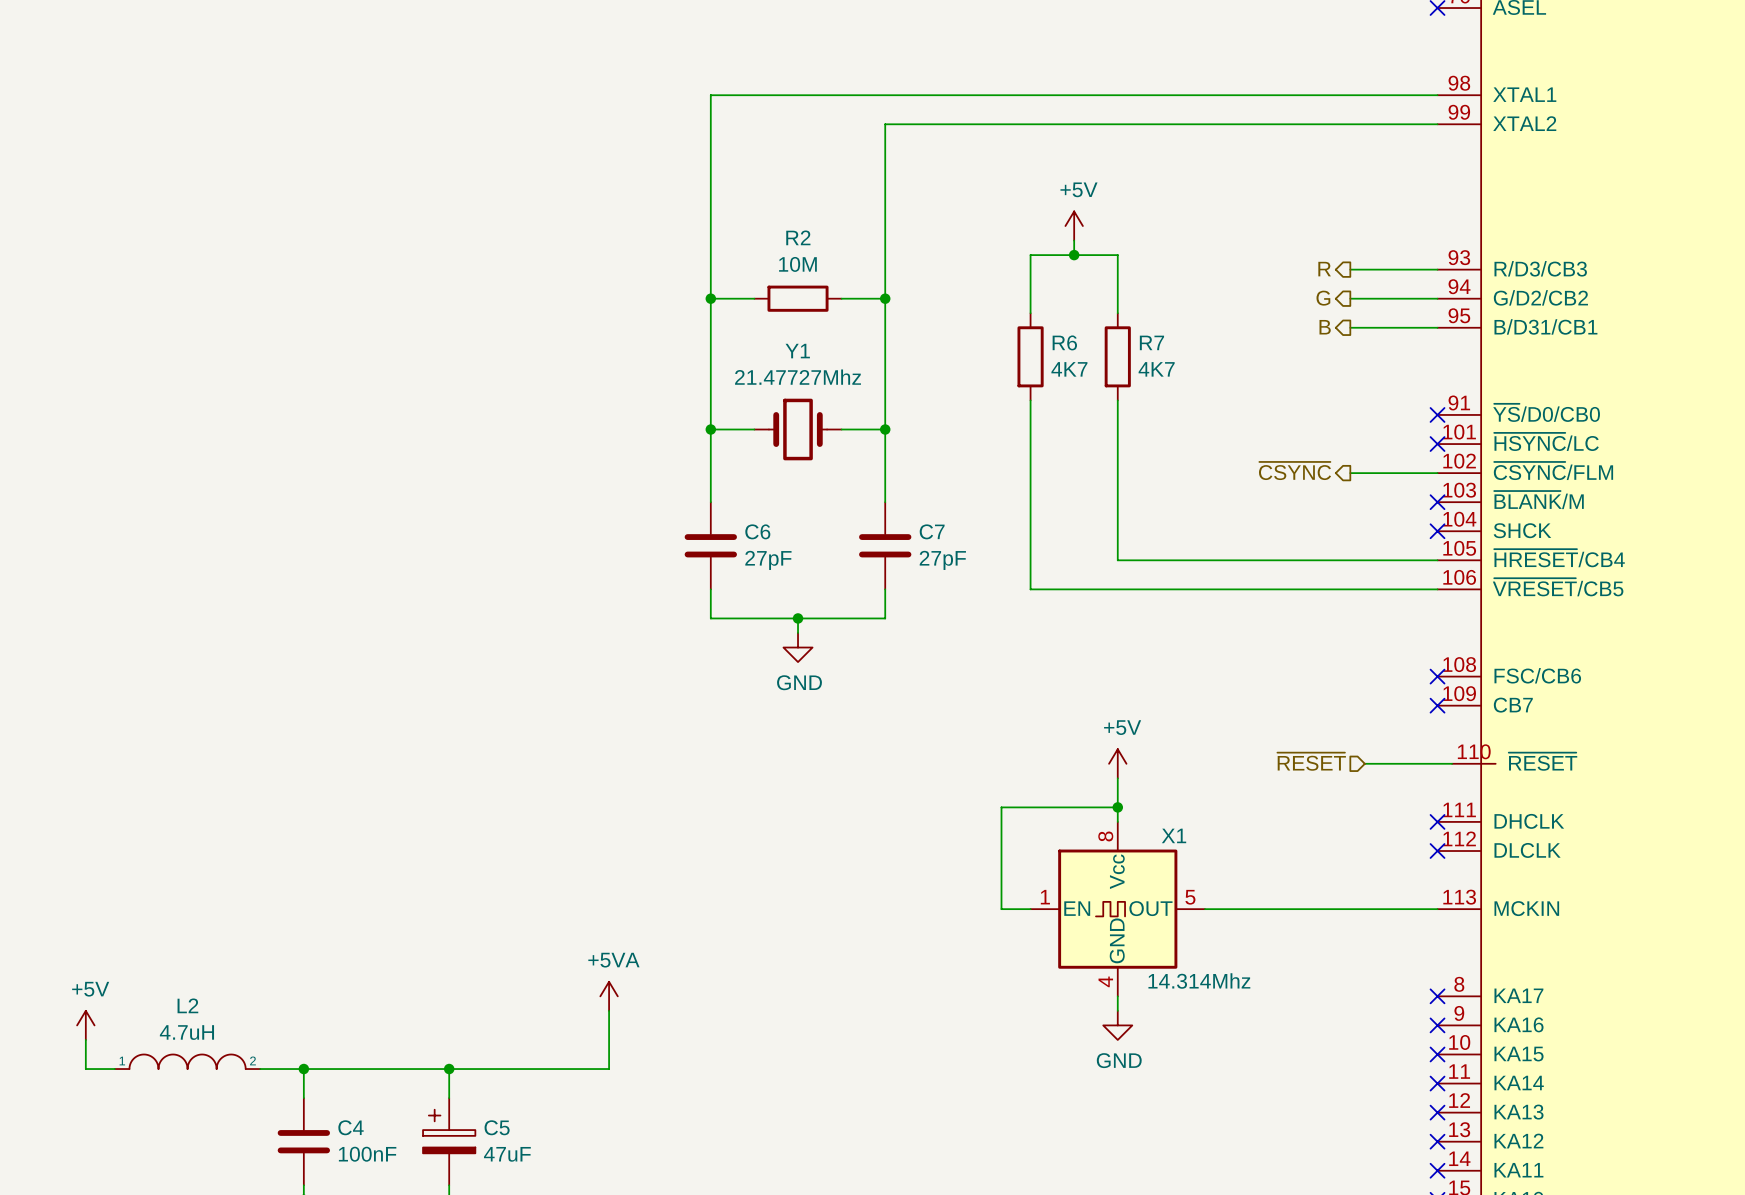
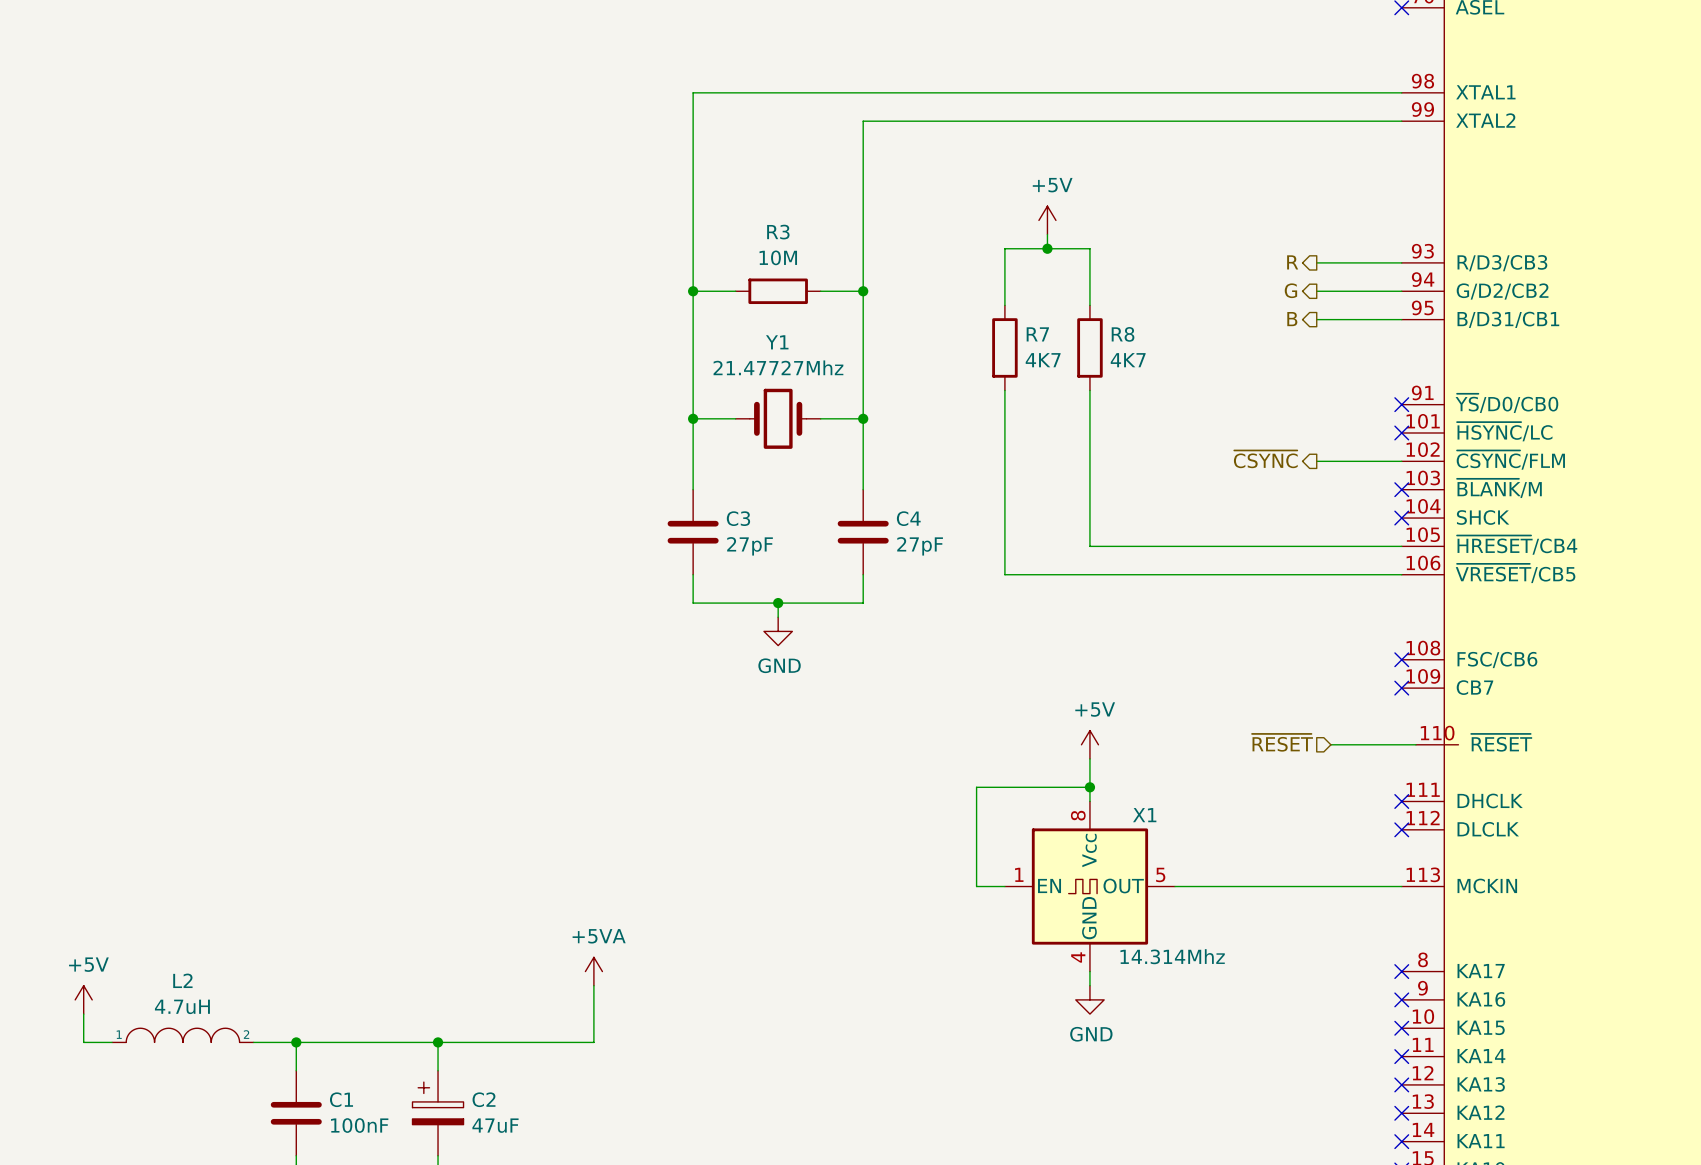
R2 name: R2 (798, 237) -> R3 (778, 232)
R6 name: R6 (1064, 342) -> R7 (1037, 334)
R7 name: R7 (1151, 342) -> R8 (1123, 334)
C6 name: C6 (757, 531) -> C3 (738, 518)
C7 name: C7 (932, 531) -> C4 (908, 518)
C4 name: C4 (351, 1127) -> C1 (341, 1099)
C5 name: C5 (497, 1127) -> C2 (484, 1099)

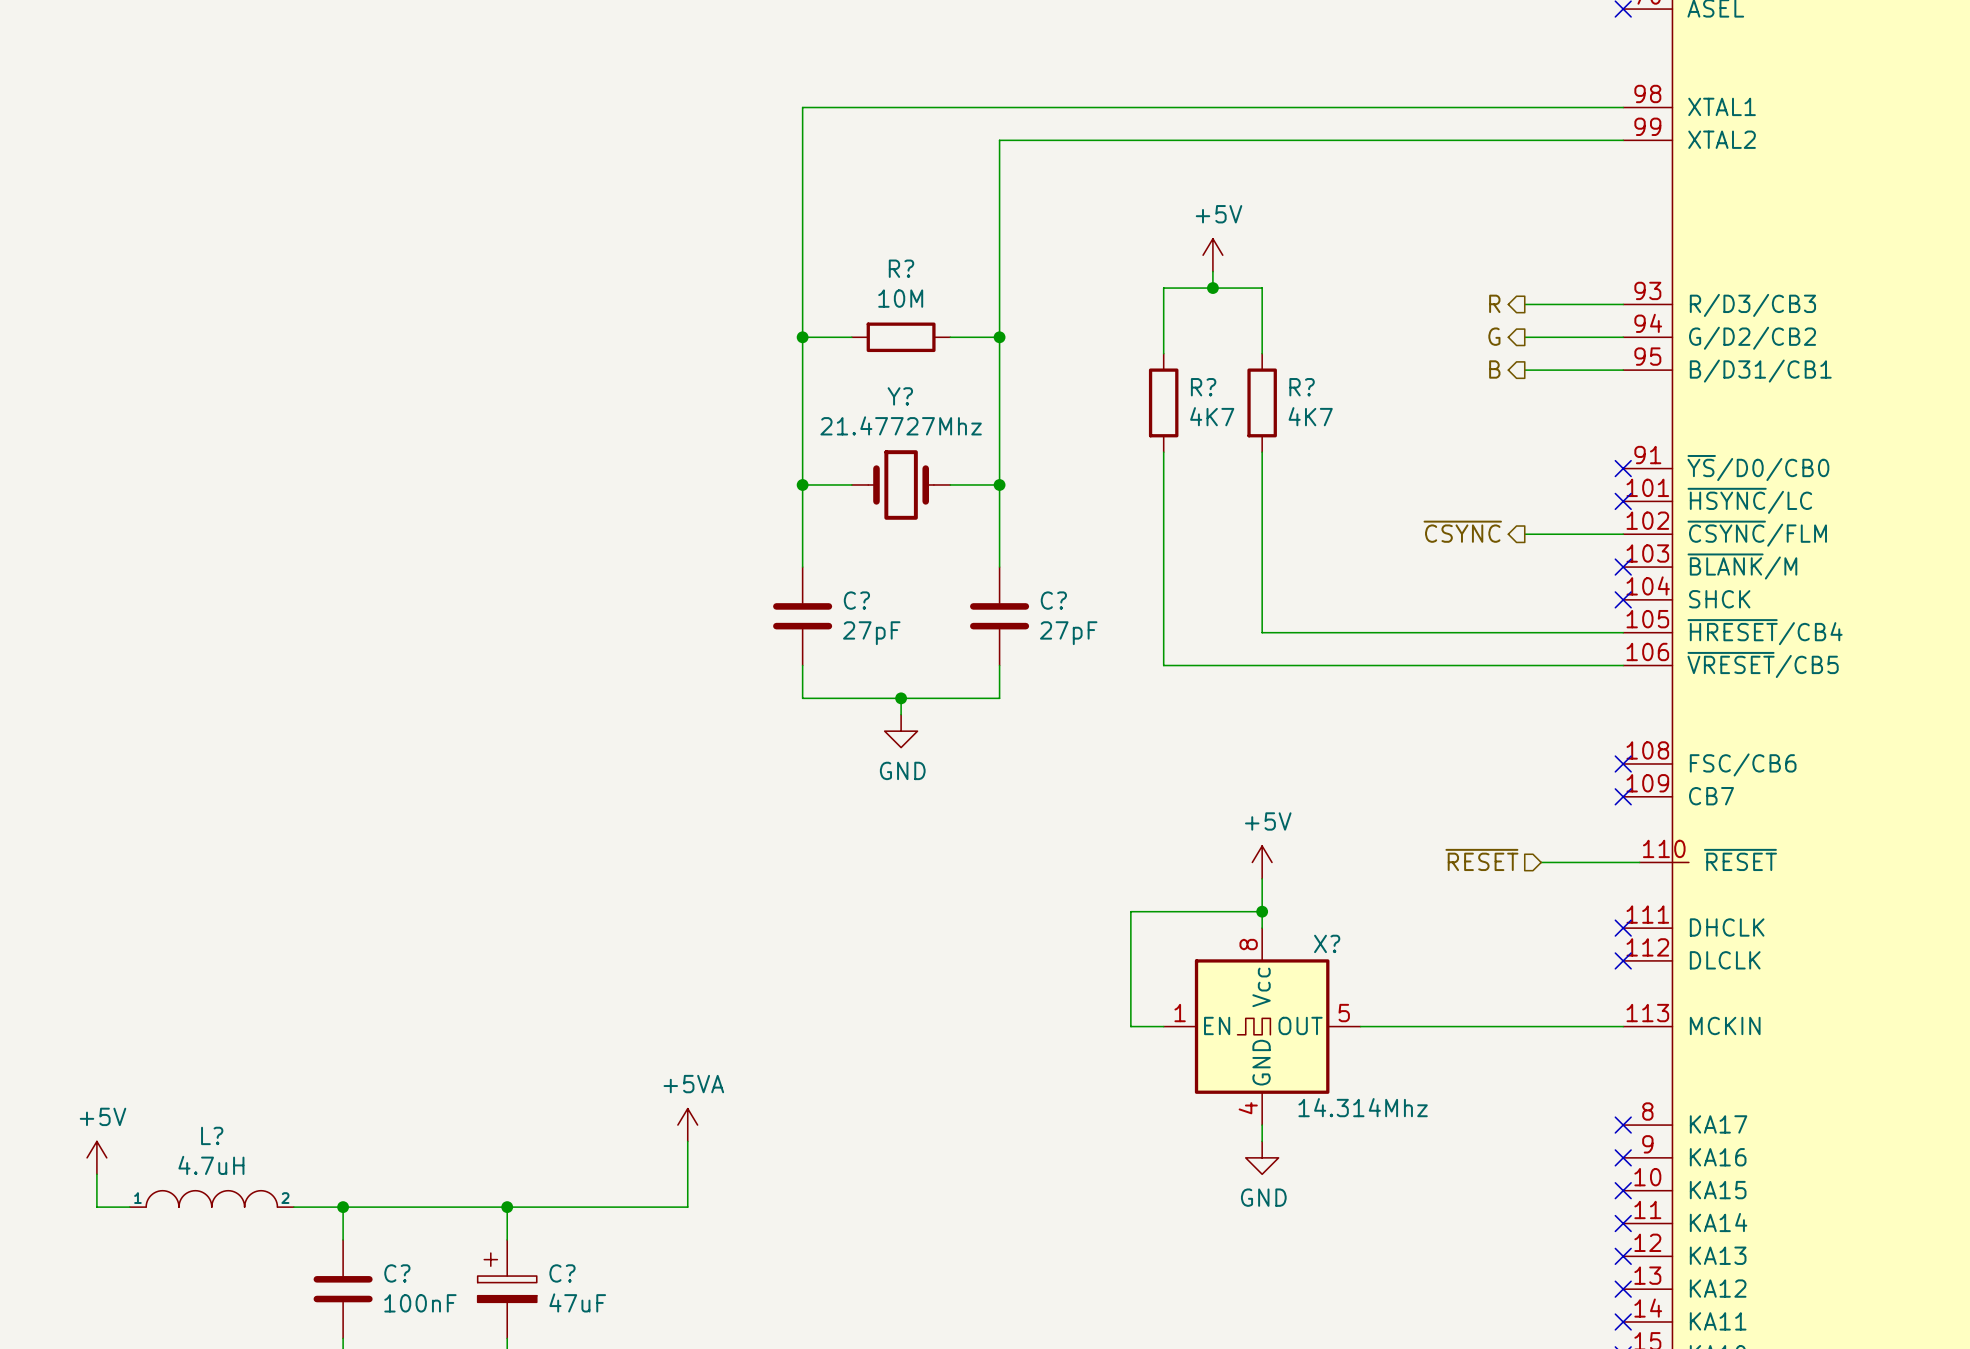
R3 name: R3 (778, 232) -> R? (901, 268)
R7 name: R7 (1037, 334) -> R? (1203, 387)
R8 name: R8 (1123, 334) -> R? (1302, 387)
Y1 name: Y1 (777, 342) -> Y? (900, 396)
C3 name: C3 (738, 518) -> C? (856, 600)
C4 name: C4 (908, 518) -> C? (1053, 600)
X1 name: X1 (1144, 815) -> X? (1327, 943)
L2 name: L2 (182, 980) -> L? (212, 1135)
C1 name: C1 (341, 1099) -> C? (397, 1273)
C2 name: C2 (484, 1099) -> C? (562, 1273)

